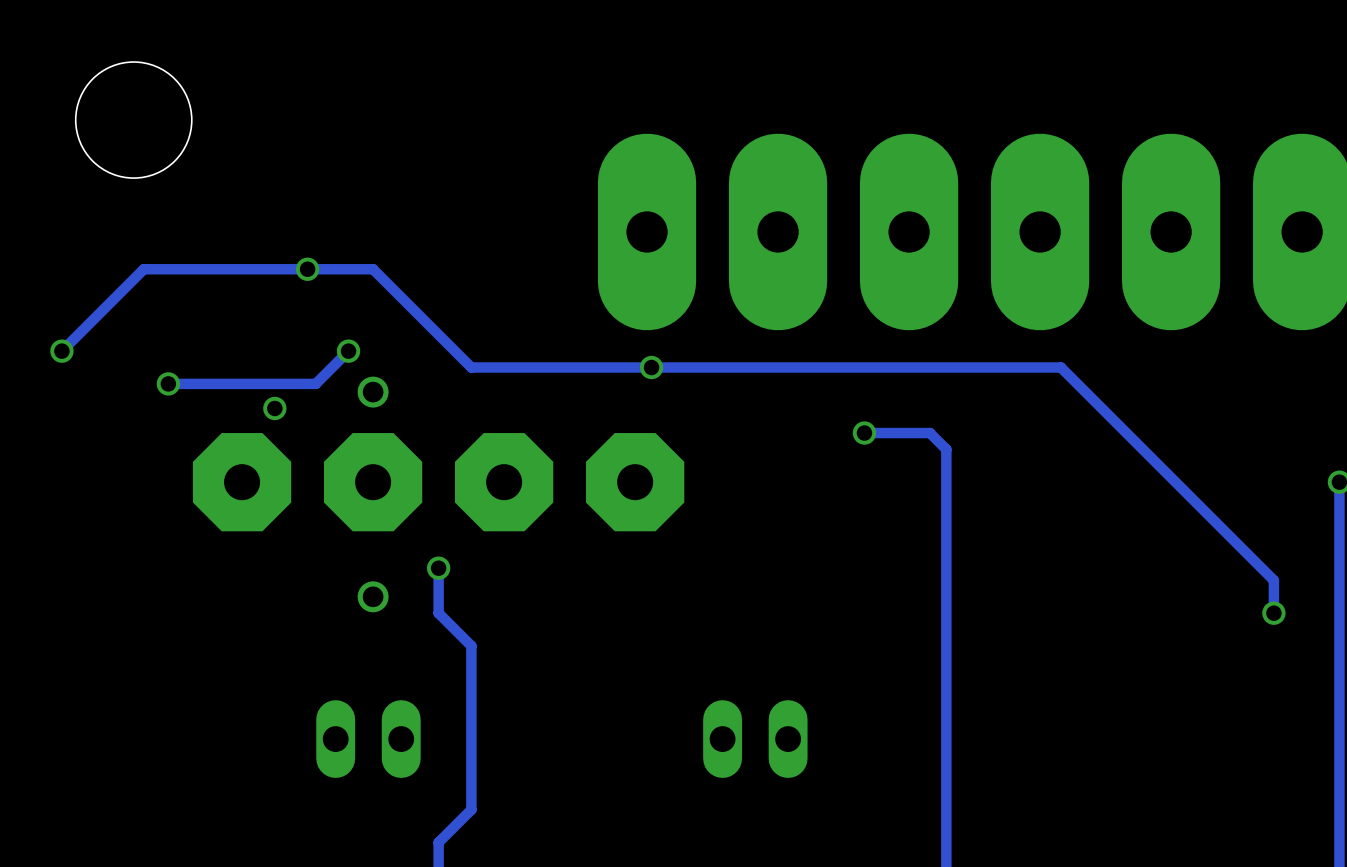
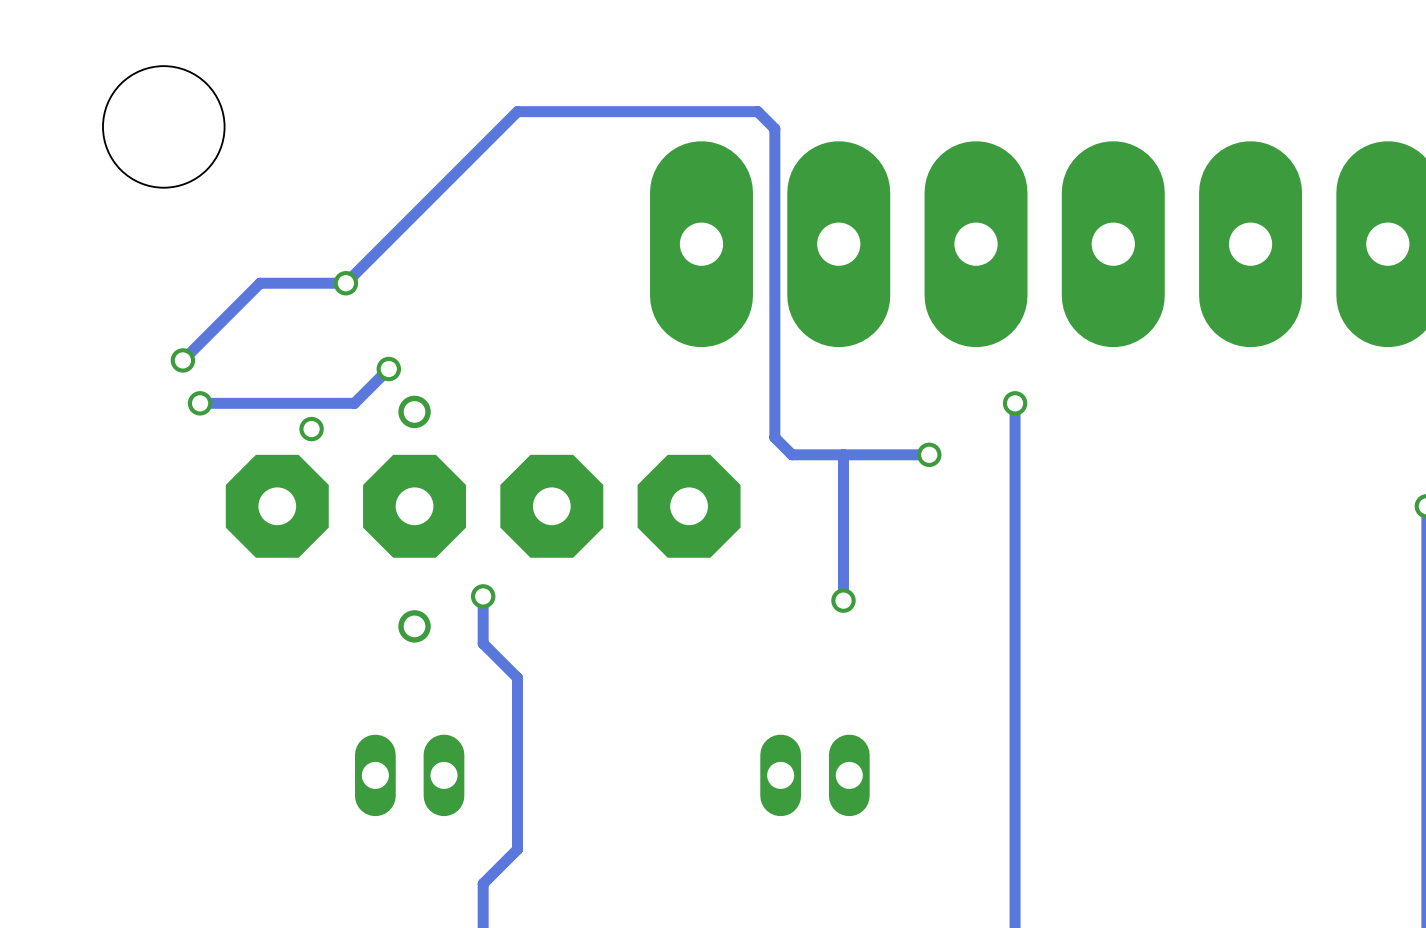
track: (225, 269) (143, 269) (61, 351) -> (260, 283) (182, 360)
track: (307, 269) (373, 269) (471, 367) (1060, 367) (1273, 580) (1273, 613) -> (345, 283) (517, 111) (757, 111) (774, 128) (774, 437) (792, 454) (929, 454)
via position: (61, 351) -> (182, 360)
via: (651, 367) -> none
via: none -> (1015, 403)
track: none -> (843, 454) (843, 600)
track: (864, 433) (929, 433) (946, 449) -> (1015, 403) (1015, 471)
via: none -> (843, 600)
via: (1273, 613) -> none

